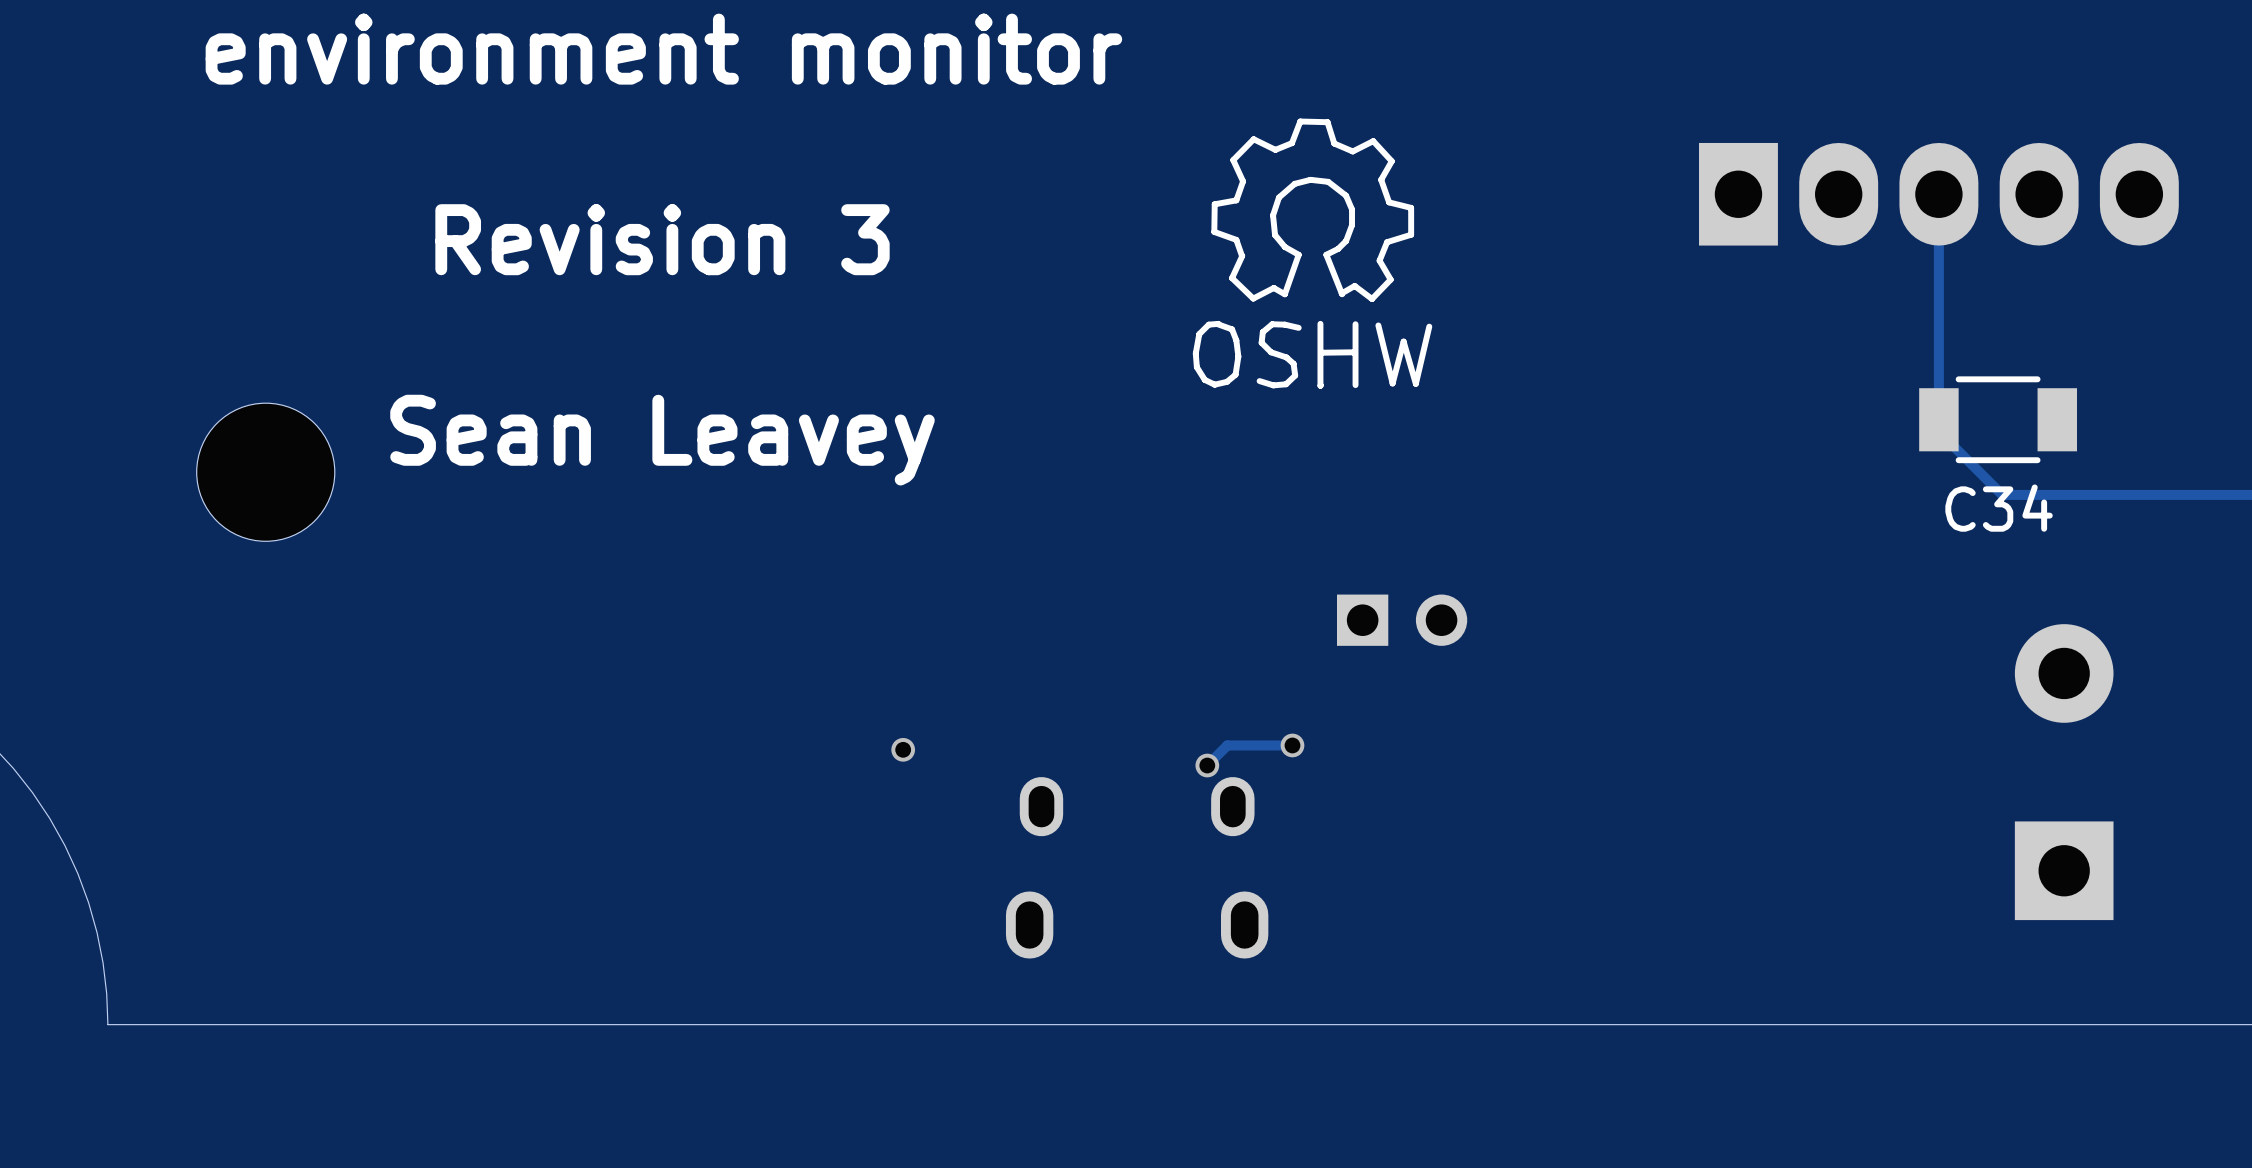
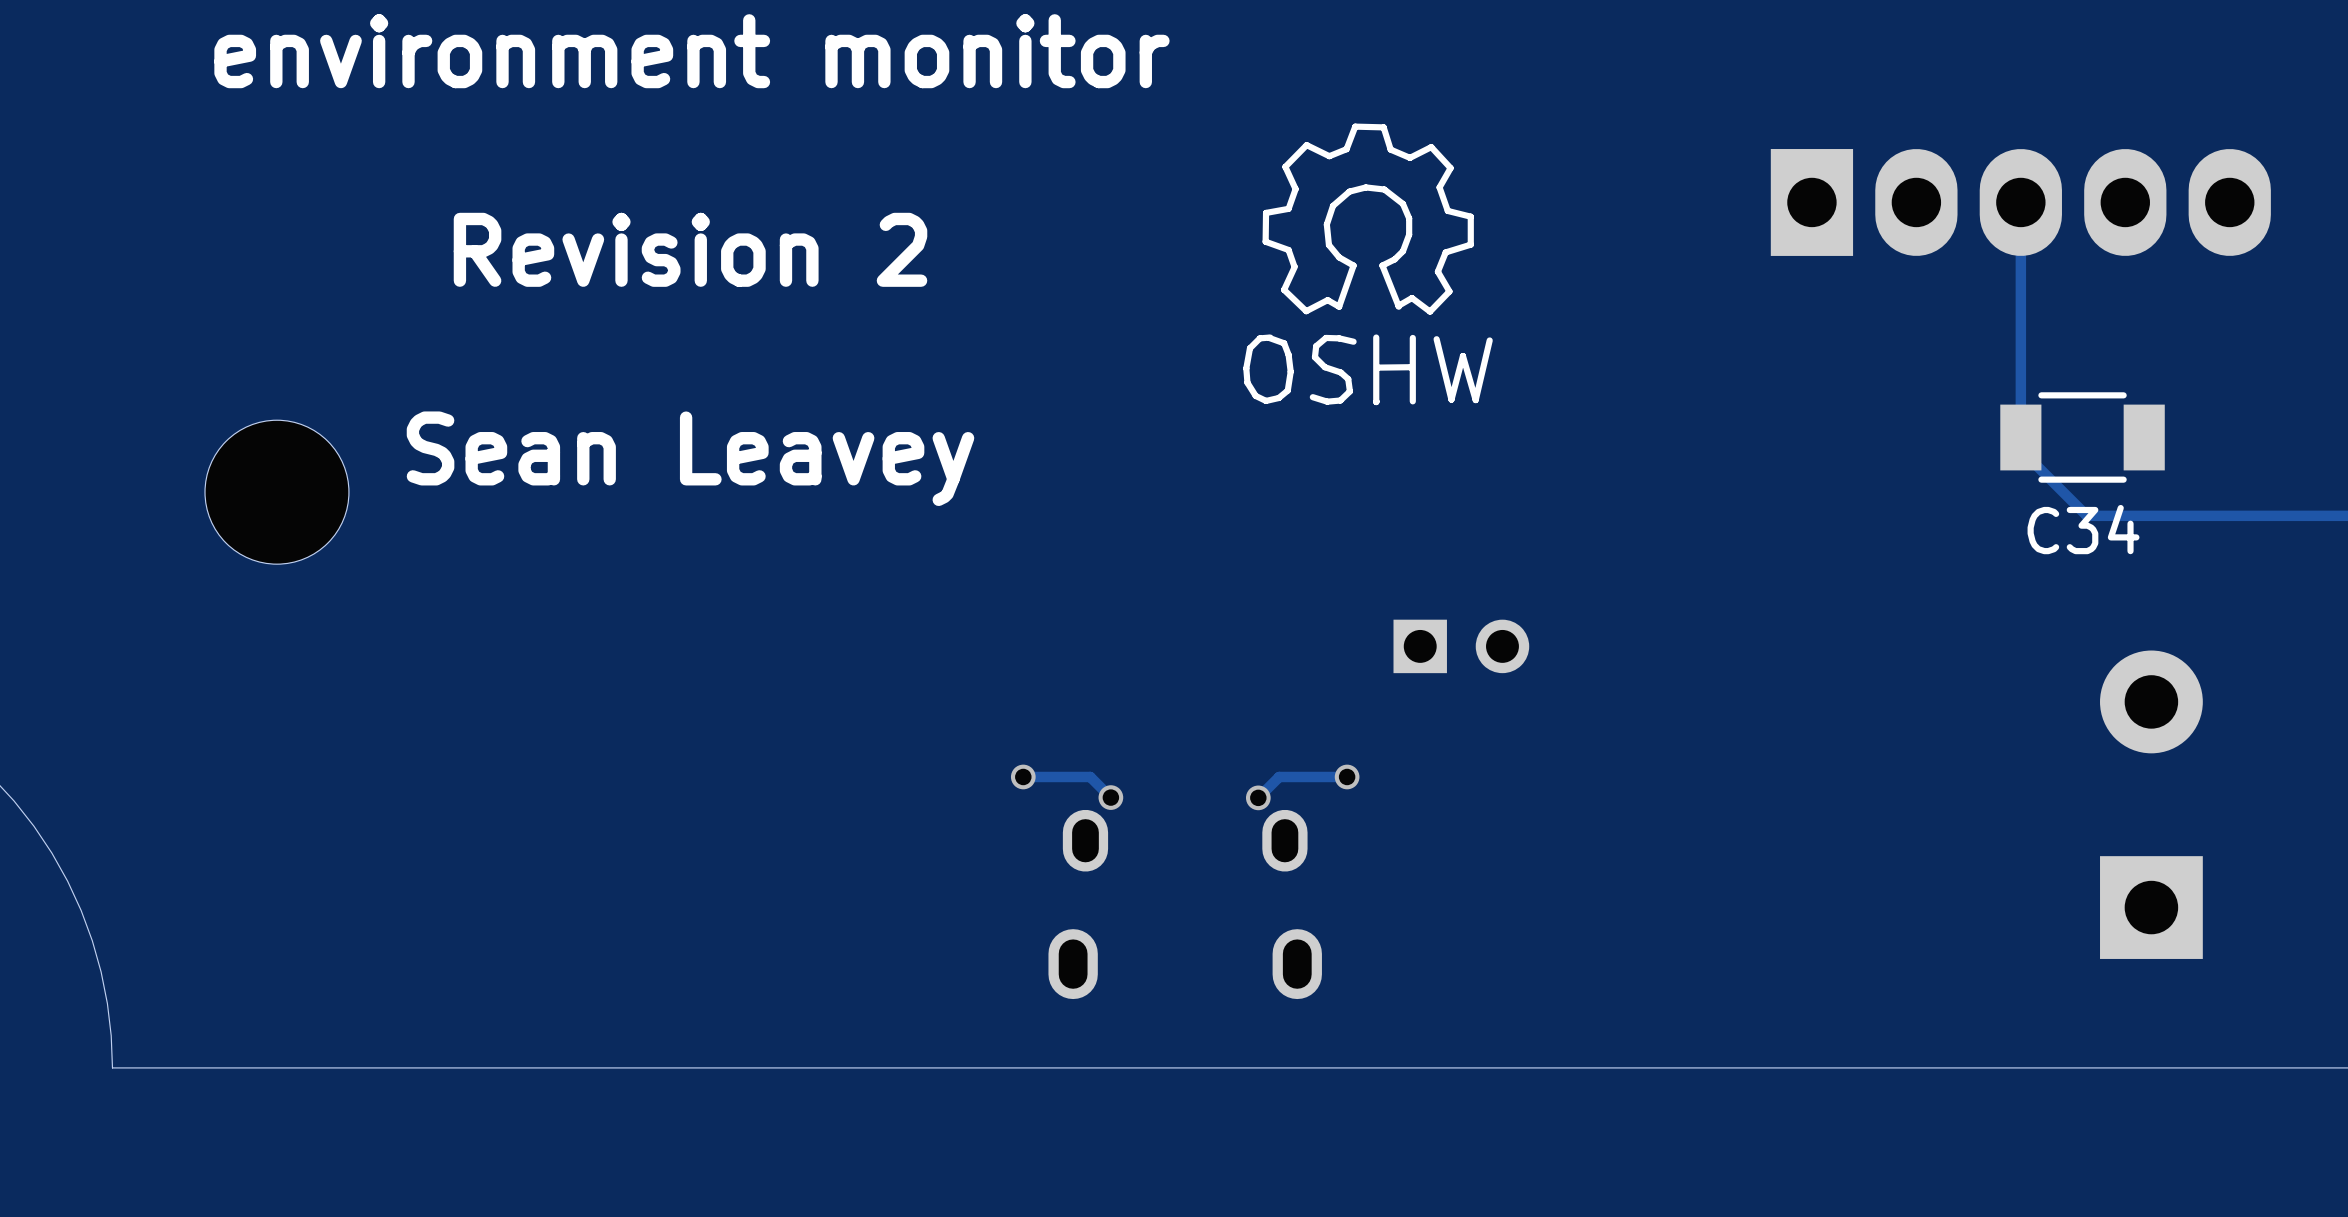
text: Revision 3 (662, 239) -> Revision 2 (690, 249)
track: none -> (1023, 776) (1090, 776) (1110, 797)
via position: (903, 749) -> (1023, 776)
via: none -> (1110, 797)

